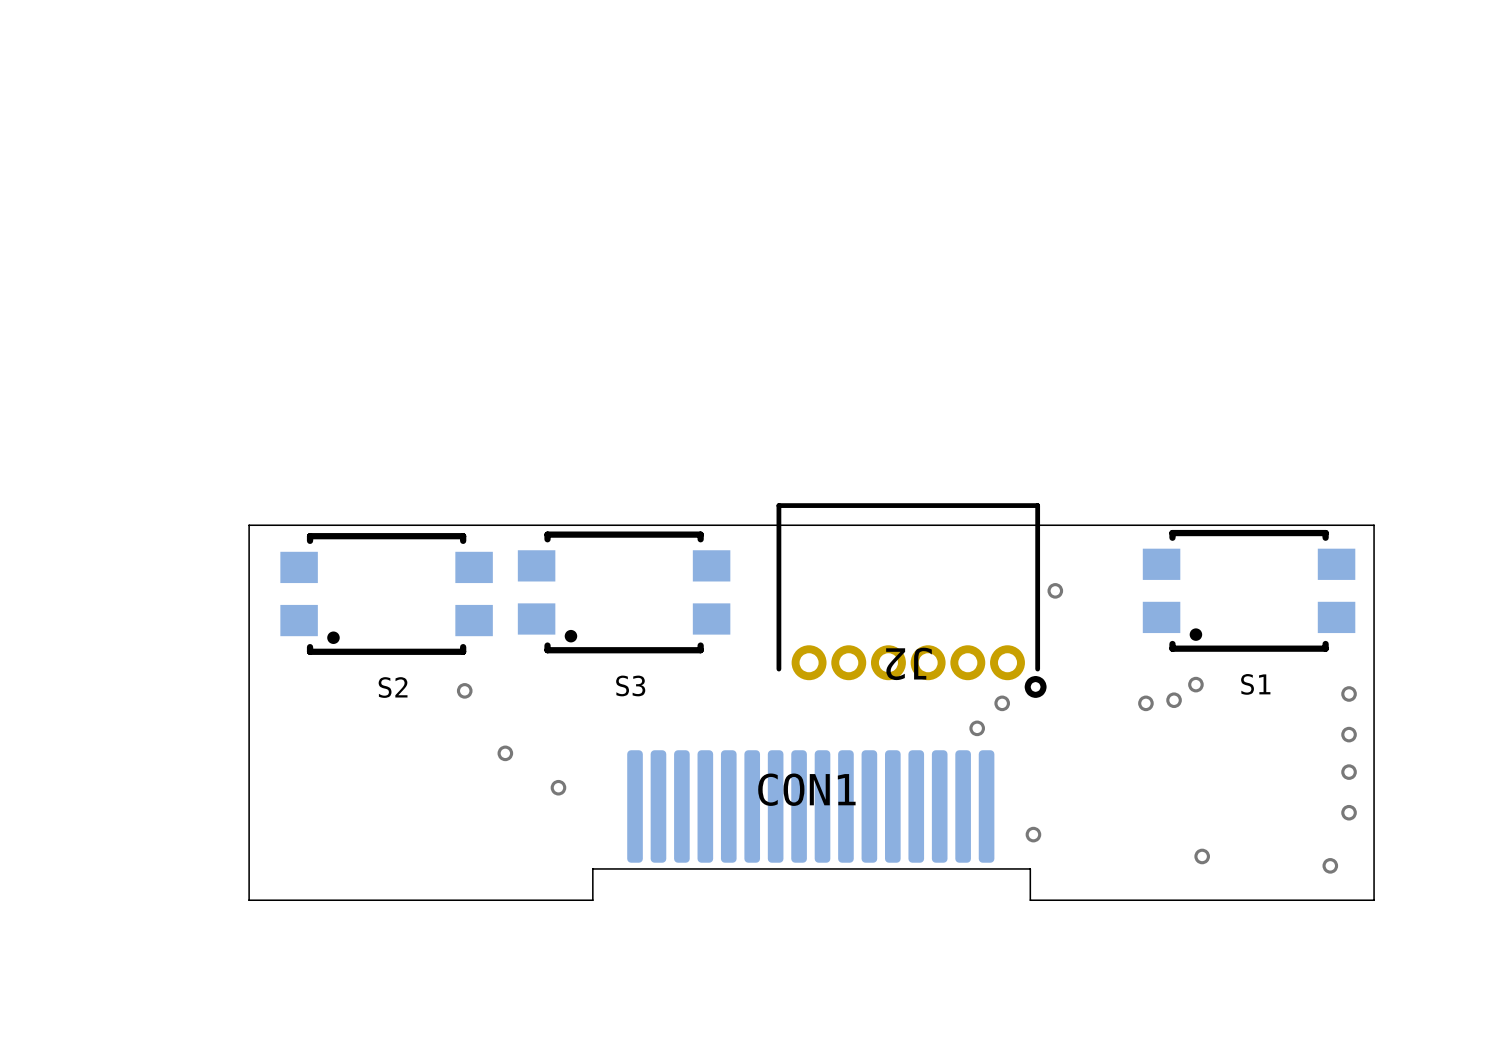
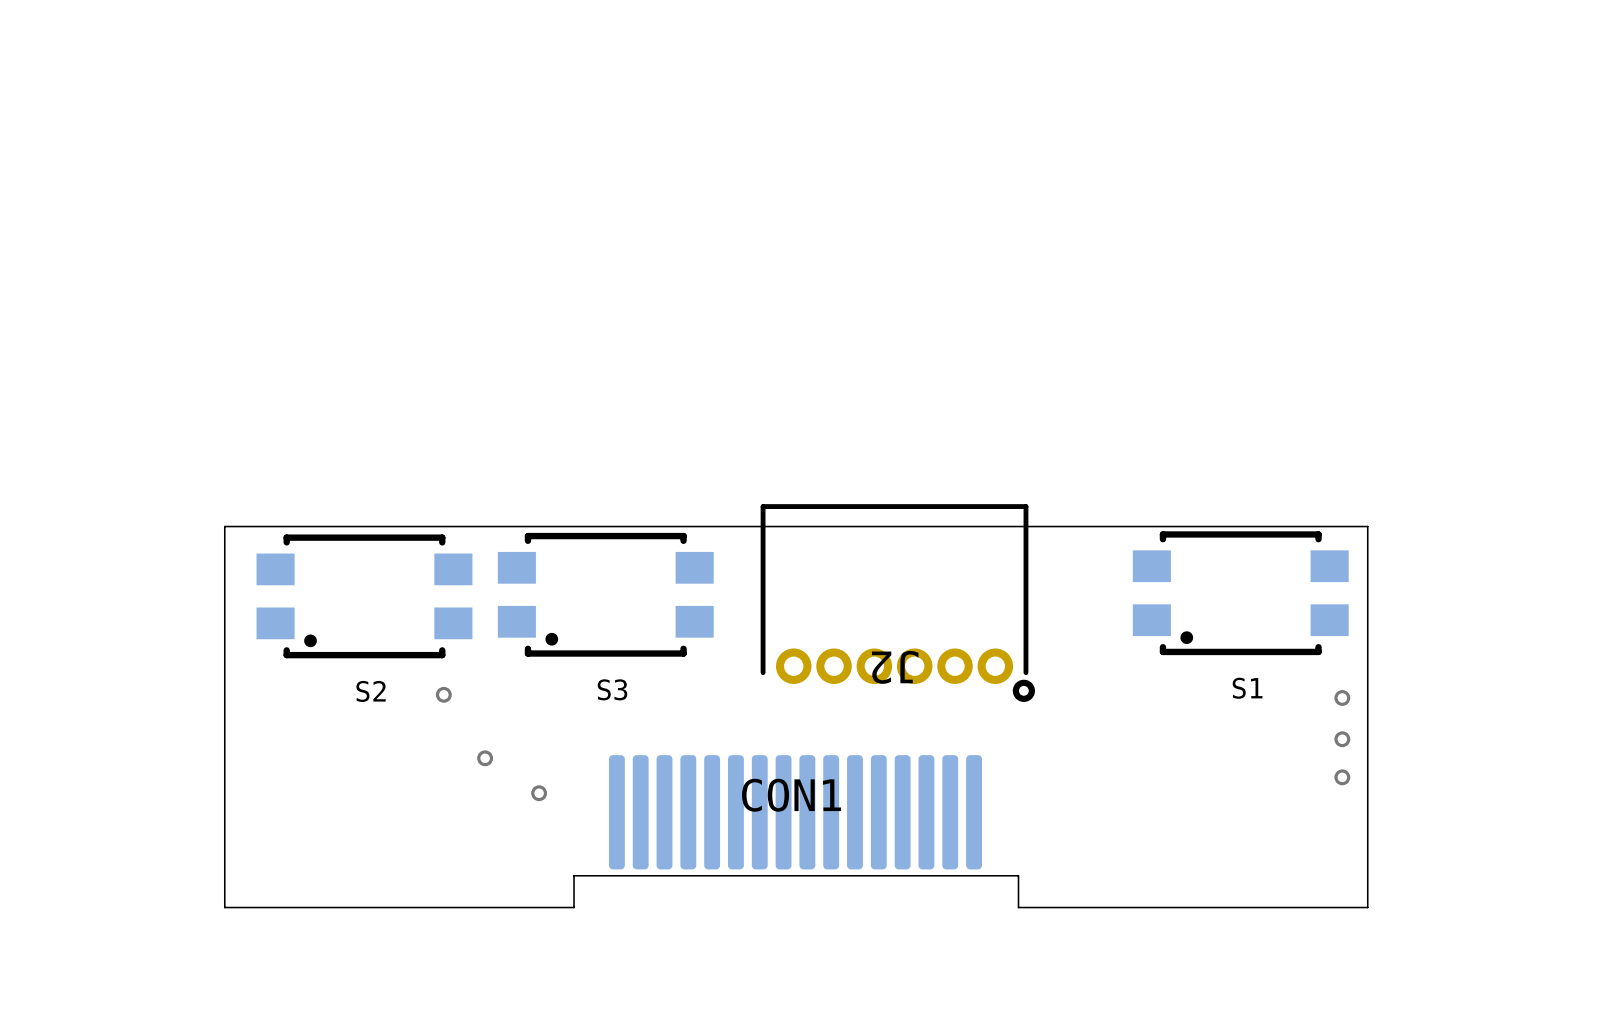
via: (1055, 590) -> none
via: (1195, 684) -> none
via: (1174, 700) -> none
via: (1002, 703) -> none
via: (1145, 703) -> none
via: (977, 728) -> none
via: (1349, 812) -> none
via: (1033, 834) -> none
via: (1202, 856) -> none
via: (1330, 865) -> none

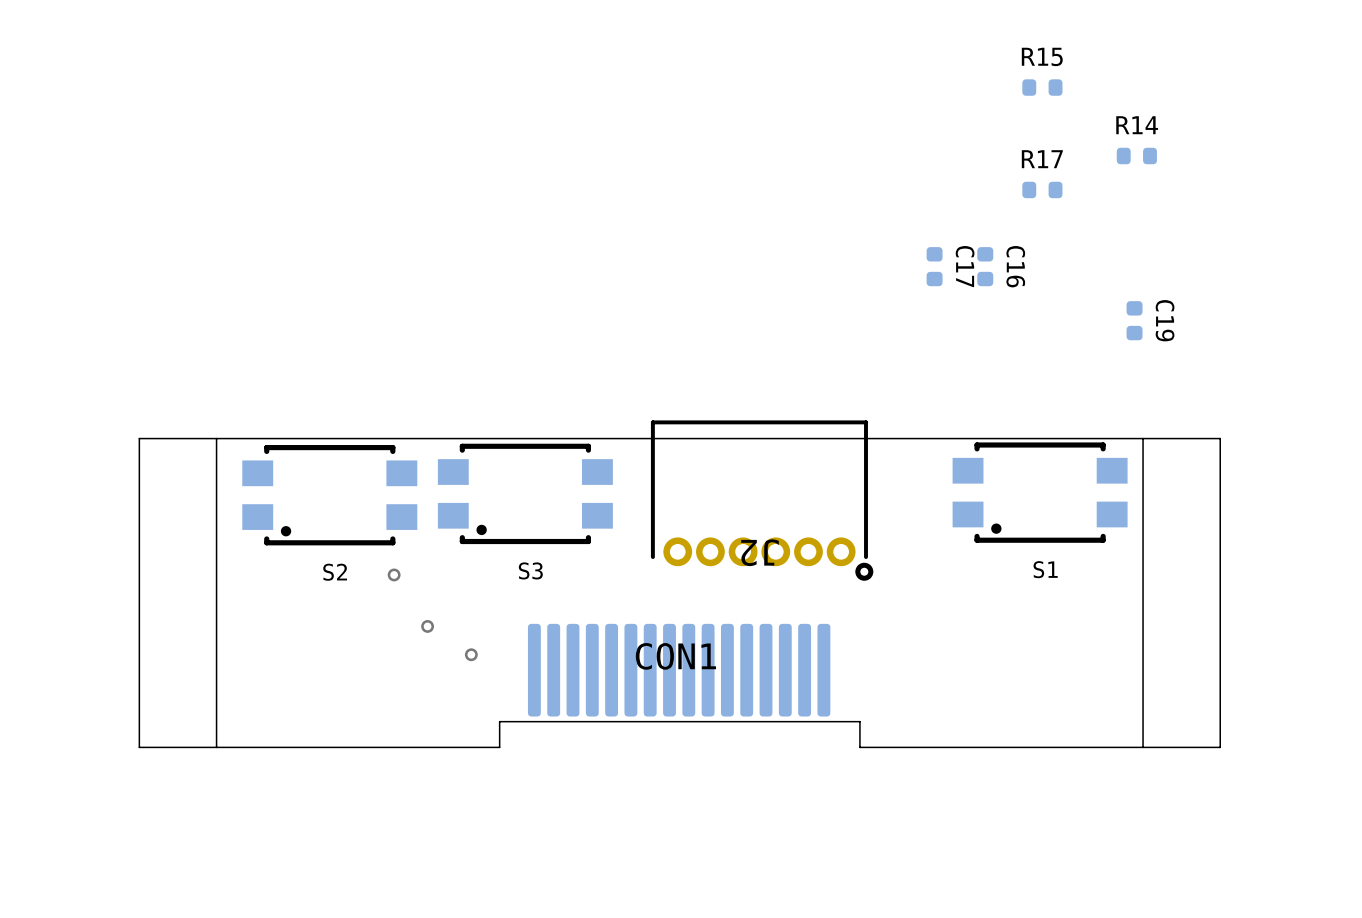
R15: none -> (1042, 87)
R14: none -> (1136, 156)
R17: none -> (1042, 189)
C17: none -> (934, 266)
C16: none -> (985, 266)
C19: none -> (1134, 320)
board edge: none -> (216, 438) (139, 438) (139, 747) (216, 747)
board edge: none -> (1143, 438) (1220, 438) (1220, 747) (1143, 747)
via: (1342, 697) -> none
via: (1342, 739) -> none
via: (1342, 777) -> none

